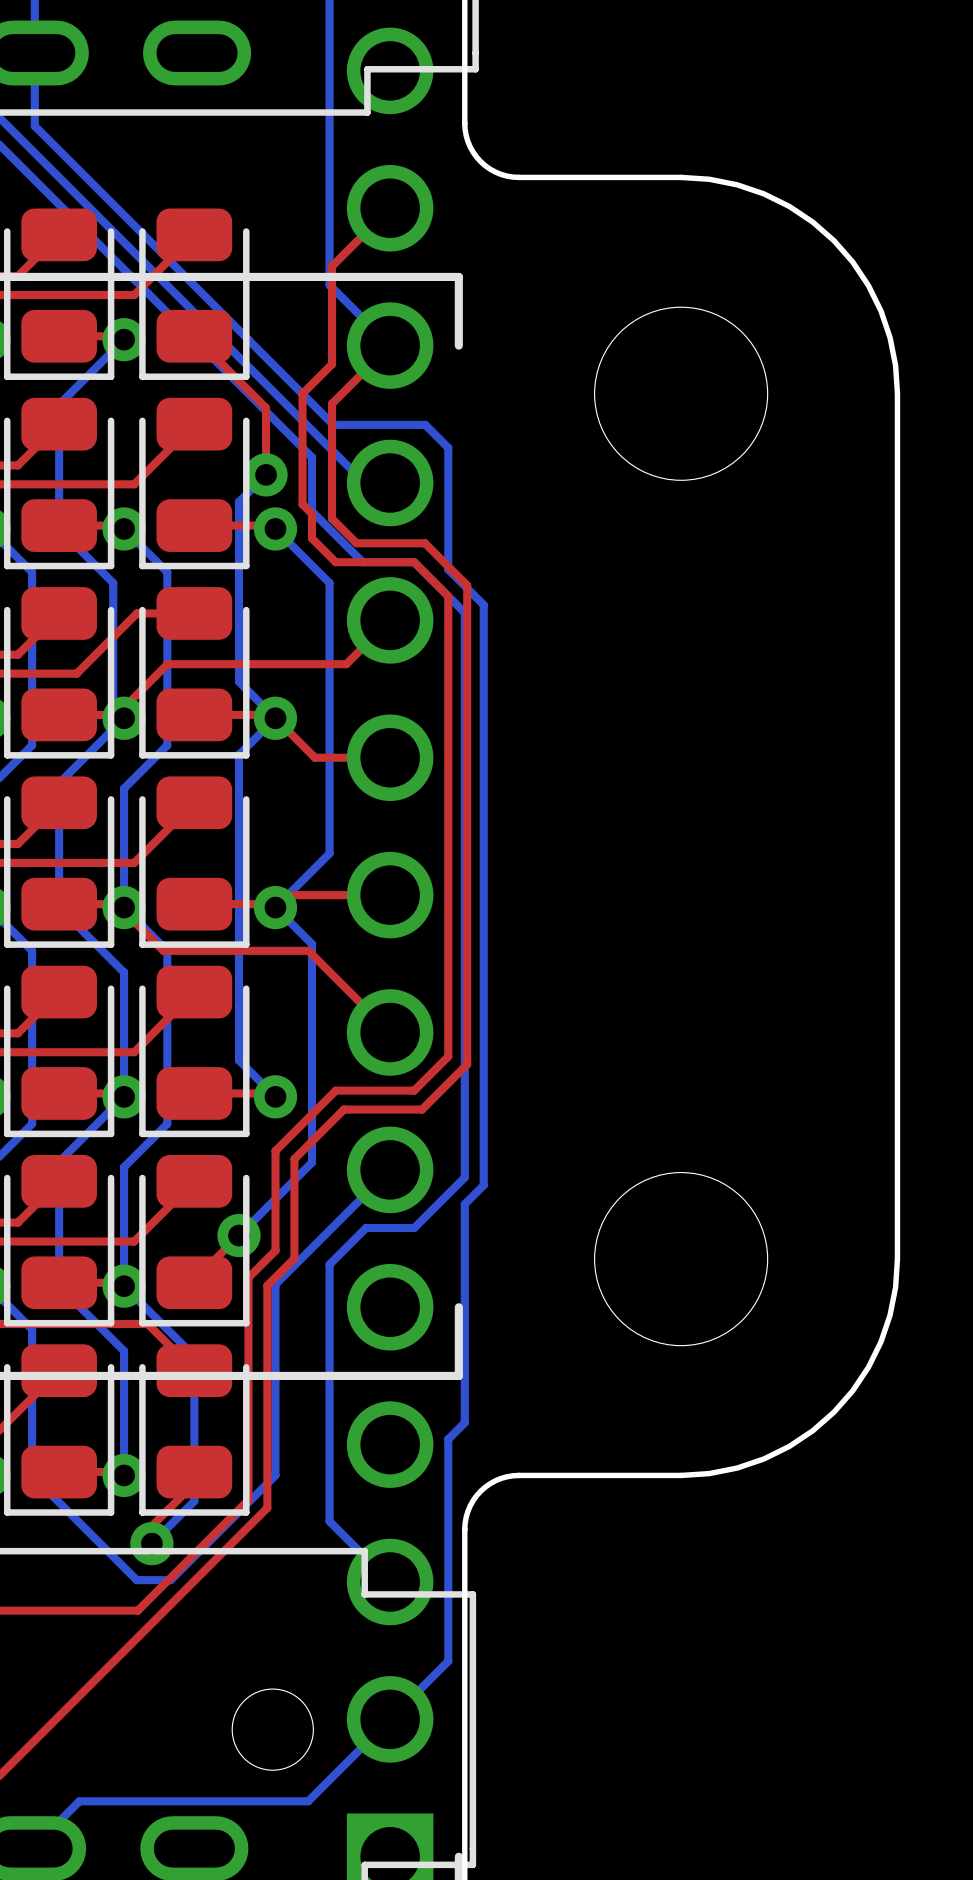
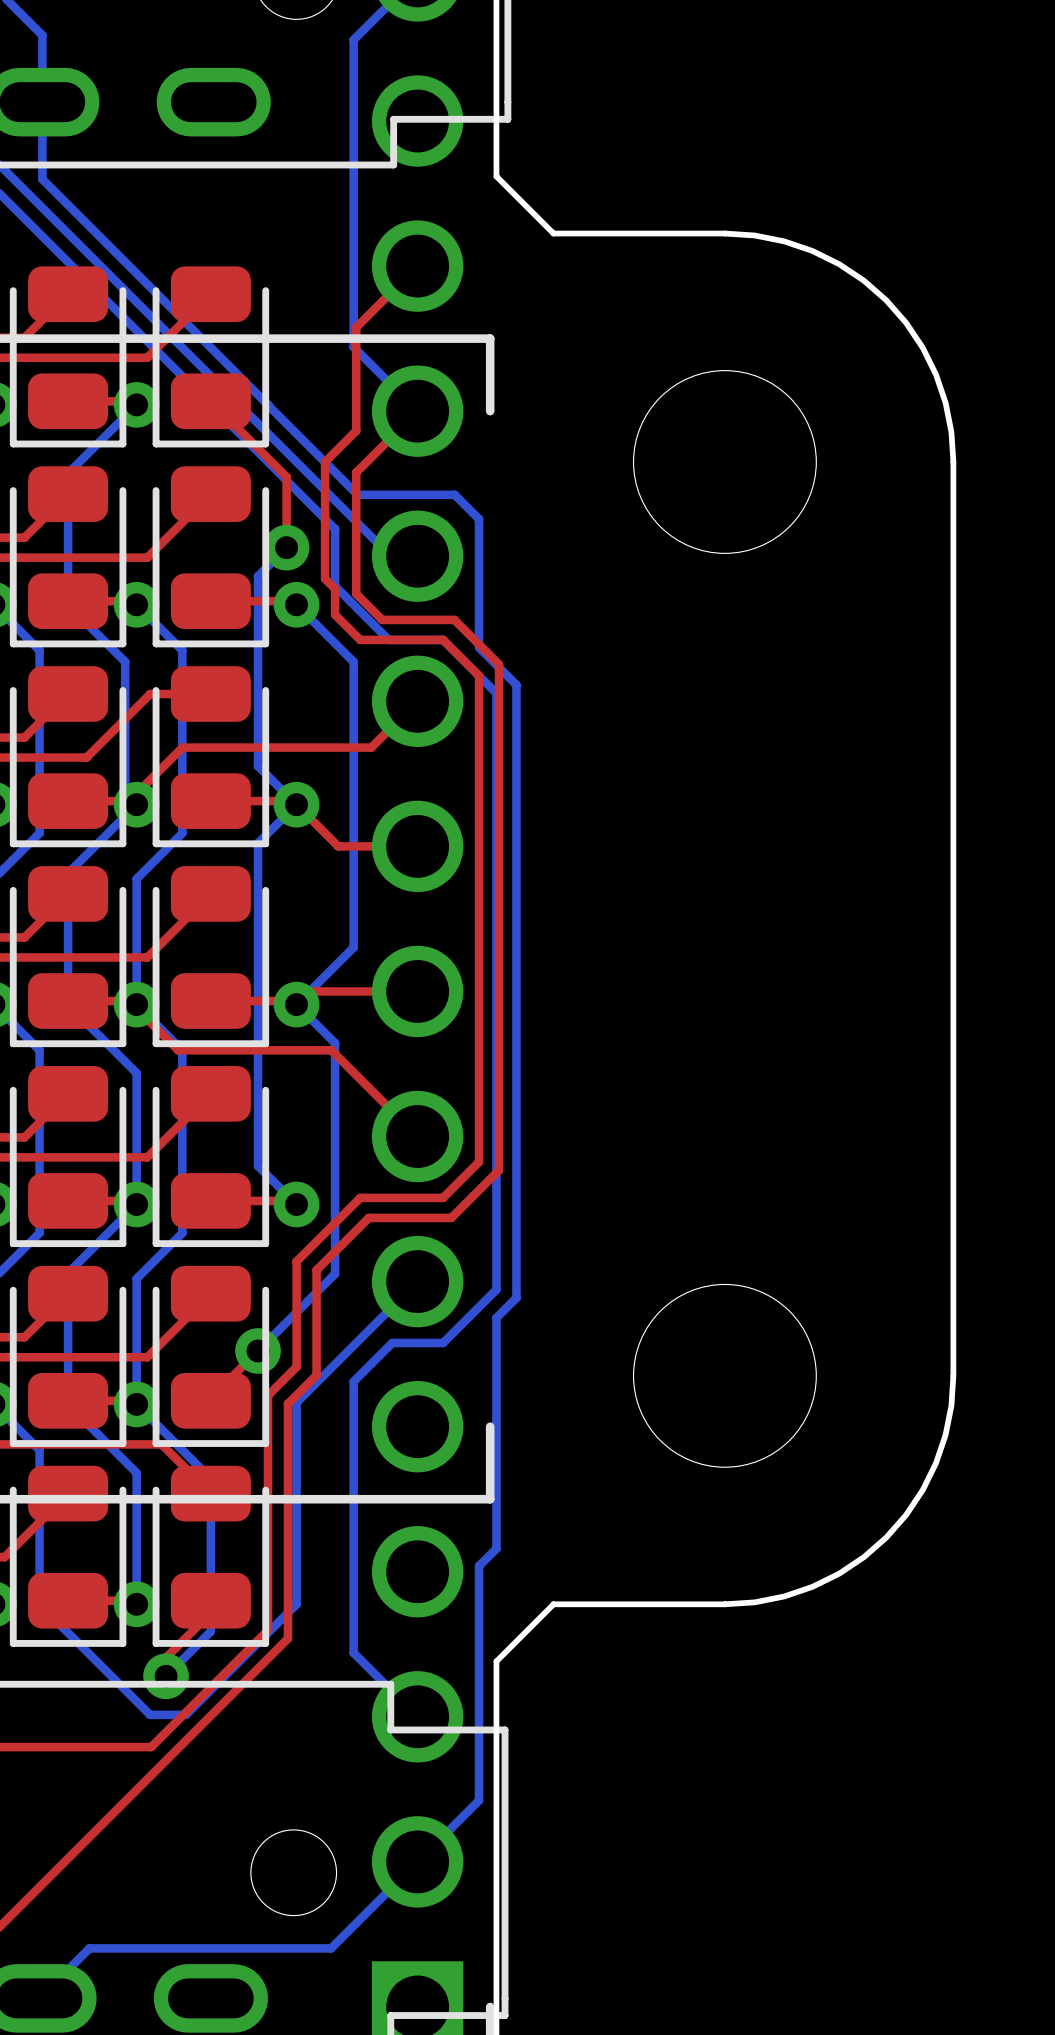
board edge: (464, 123) (470, 146) (480, 161) (501, 174) (518, 177) -> (496, 176) (553, 233)
board edge: (518, 1475) (501, 1478) (480, 1491) (467, 1511) (464, 1529) -> (553, 1604) (496, 1661)

